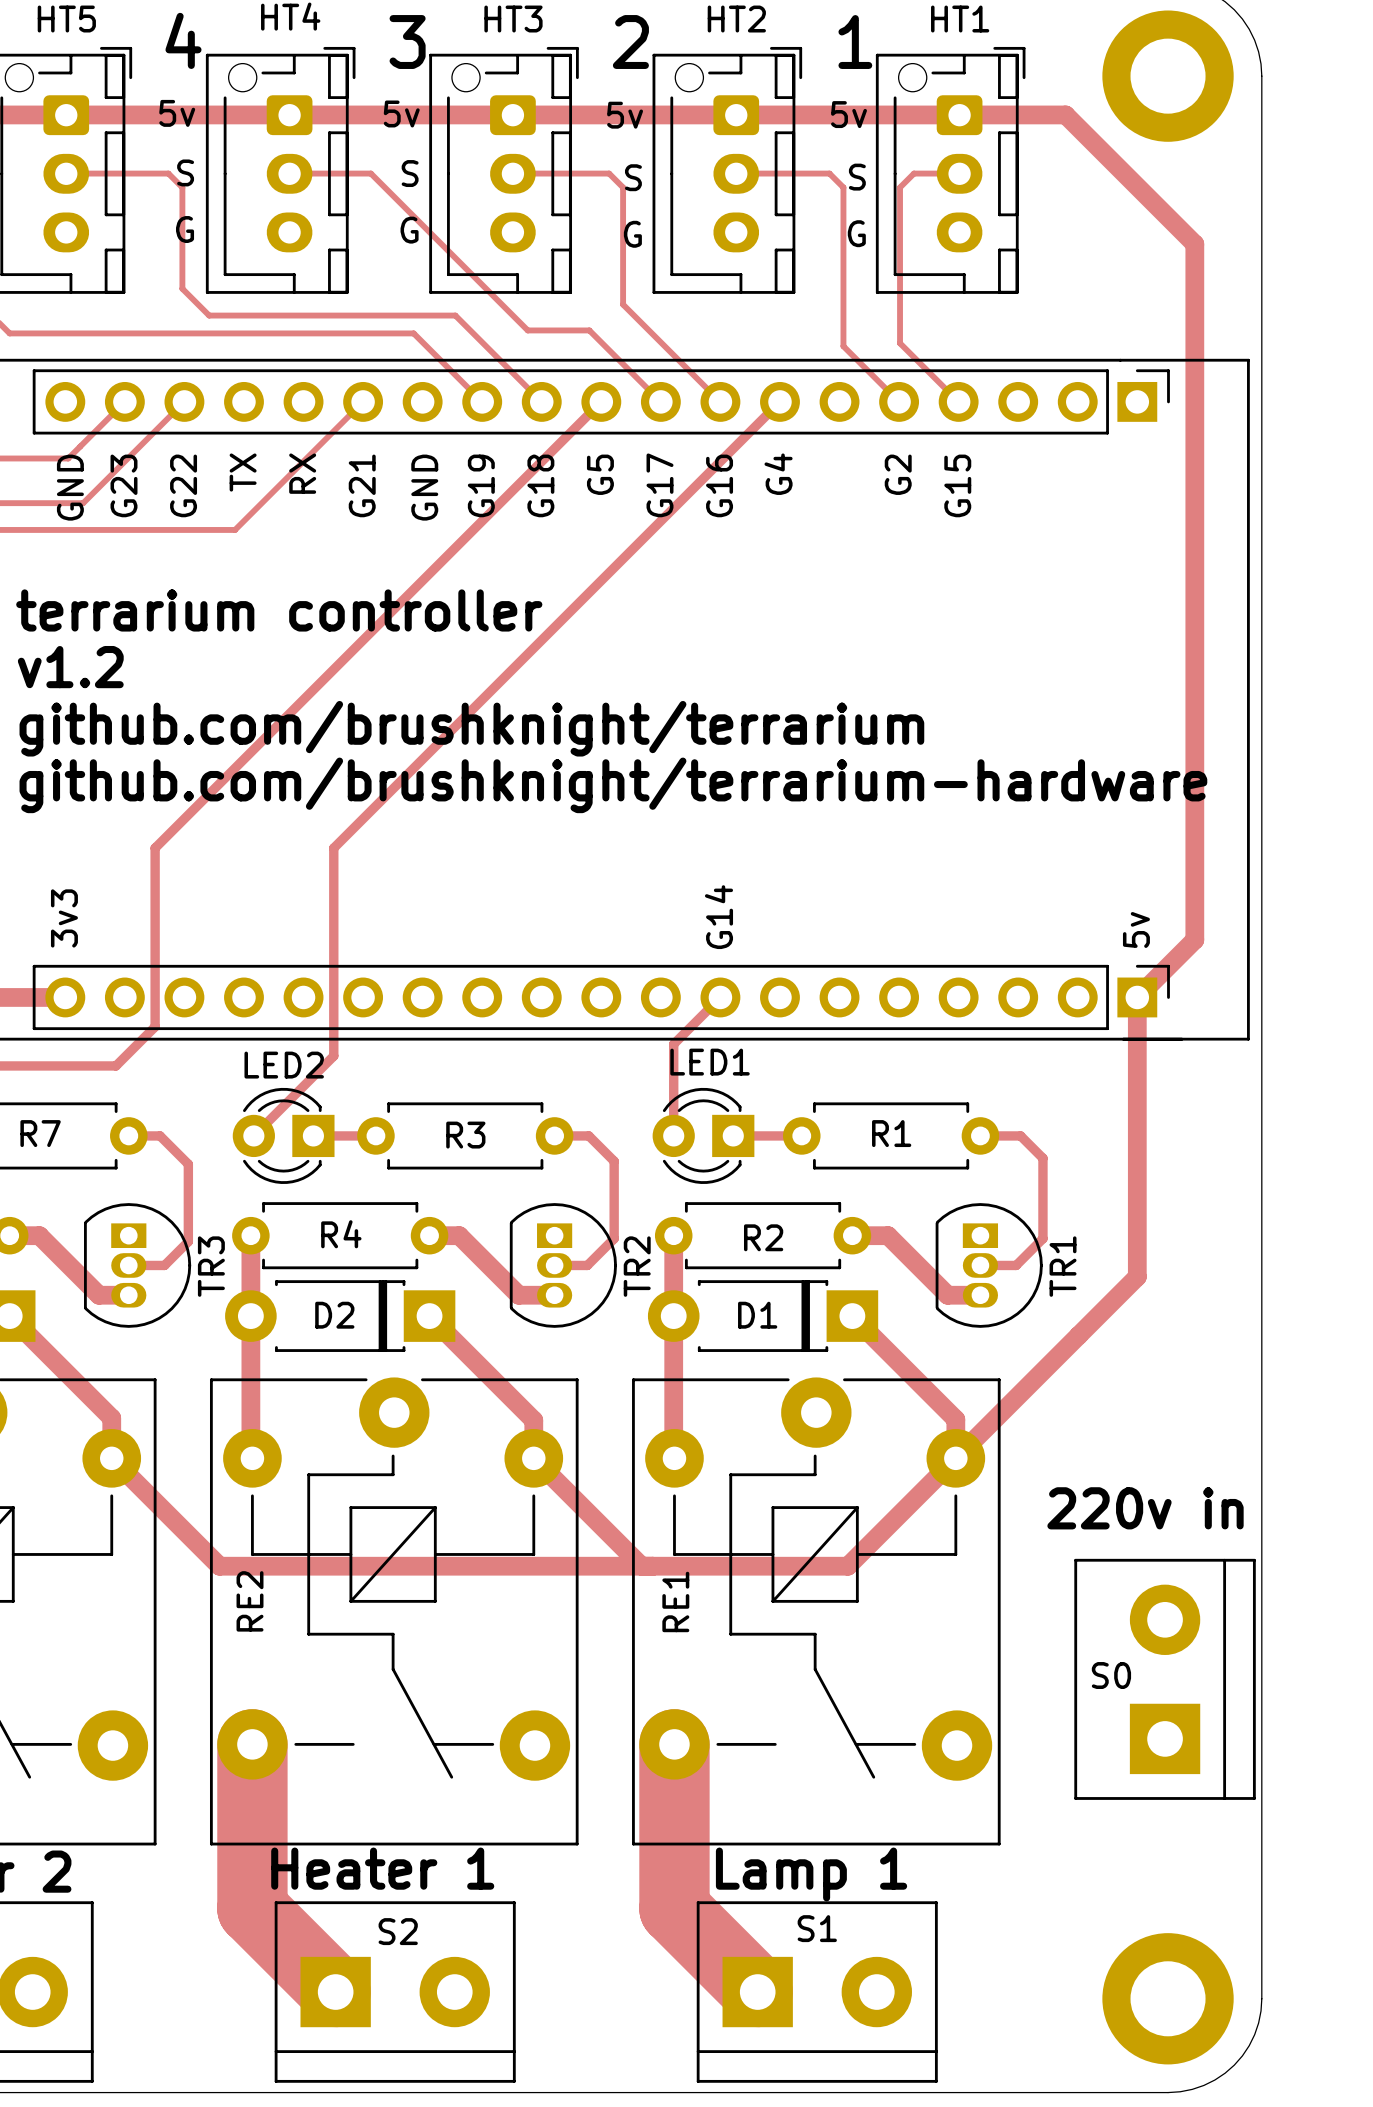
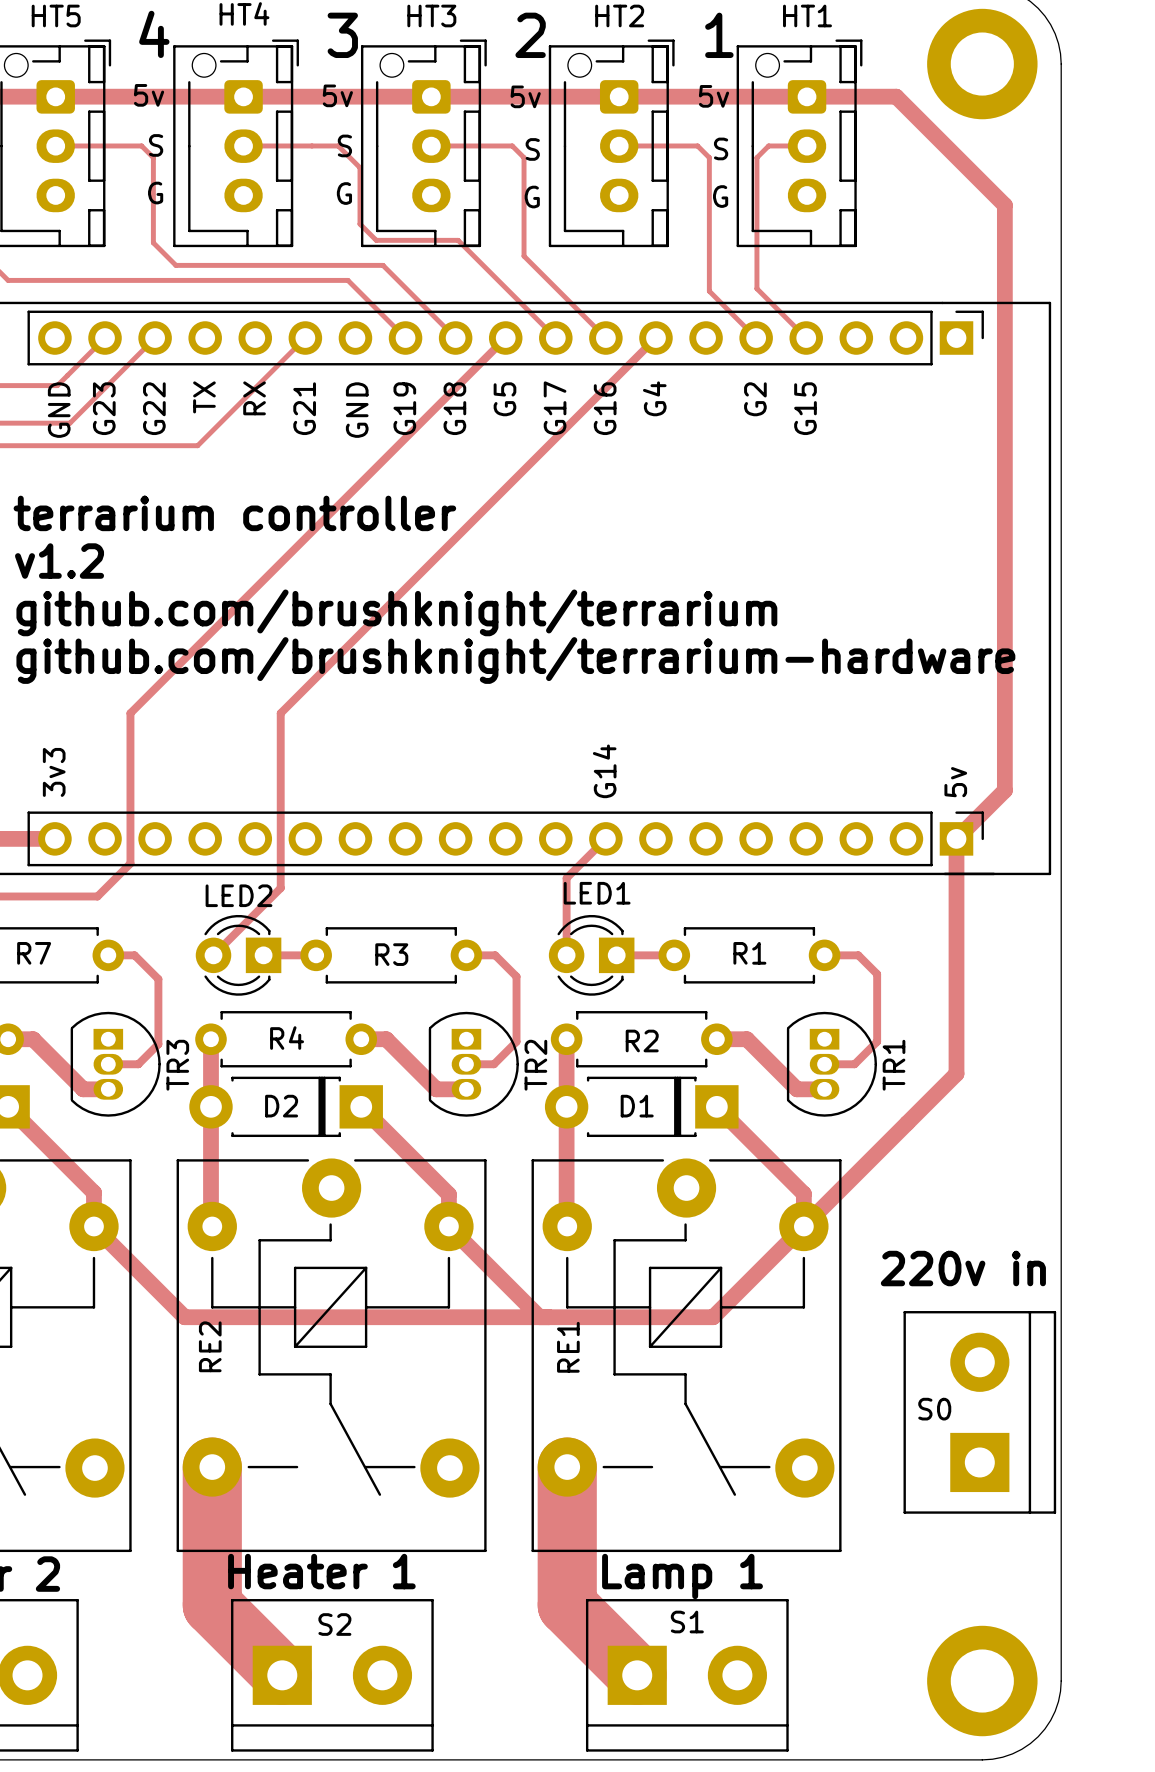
track: (370, 173) (527, 330) (589, 330) -> (311, 145) (338, 145) (360, 167) (360, 224) (376, 240) (458, 240) (495, 277)

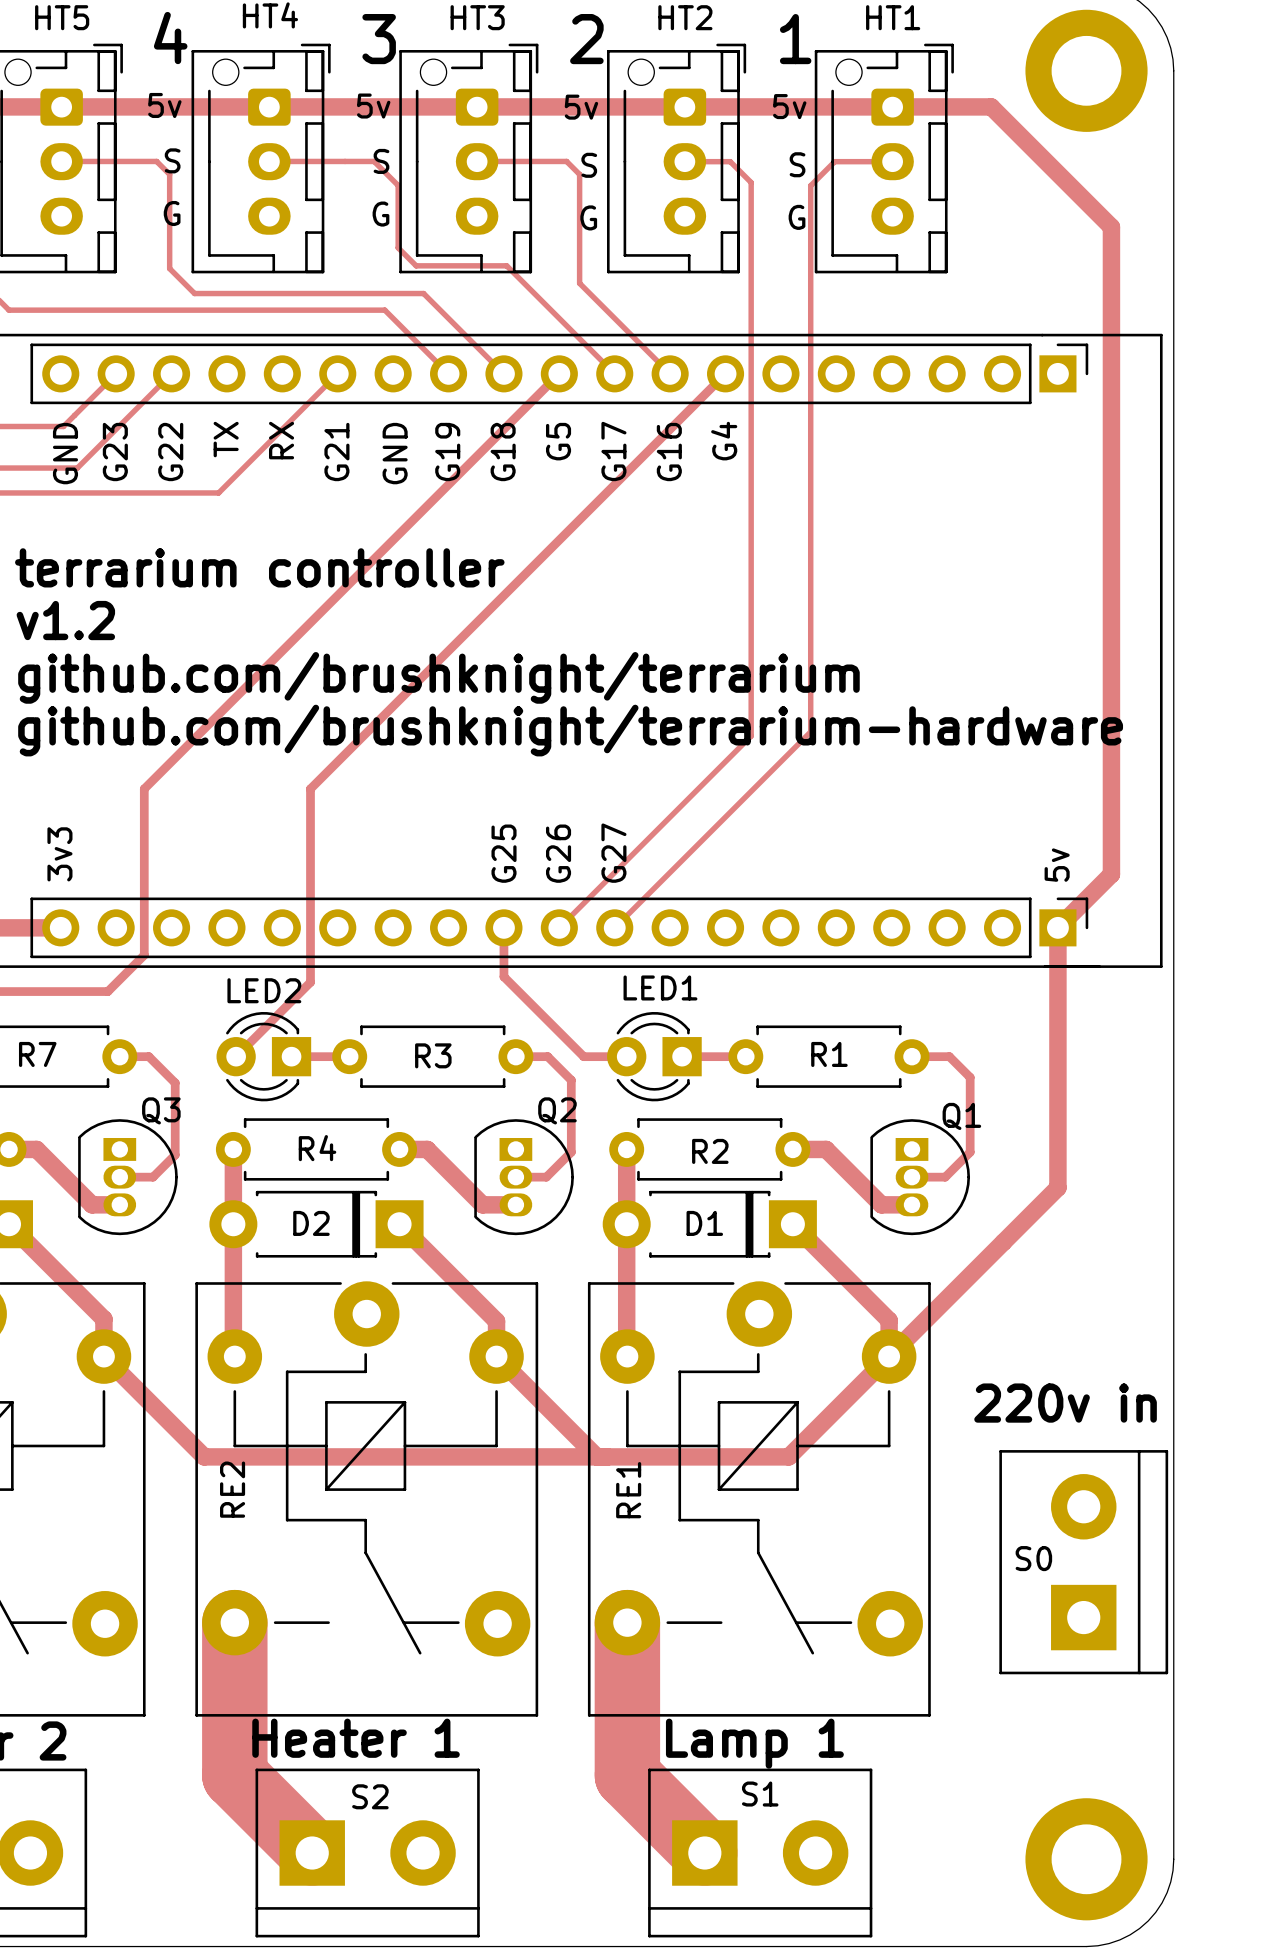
track: (768, 145) (756, 157) (756, 288) (806, 338) -> (850, 161) (834, 161) (810, 185) (810, 731) (614, 927)
track: (660, 146) (697, 145) (709, 157) (709, 291) (756, 338) -> (730, 161) (751, 182) (751, 736) (559, 927)
text: G2 (755, 399) -> none
text: G15 (805, 408) -> none
text: none -> G25 (504, 853)
text: none -> G26 (558, 853)
text: none -> G27 (613, 853)
text: G14 (604, 771) -> none
track: (605, 838) (566, 878) (566, 955) -> (503, 927) (503, 976) (583, 1056) (626, 1056)
TR3 name: TR3 (177, 1065) -> Q3 (161, 1110)
TR2 name: TR2 (535, 1065) -> Q2 (557, 1110)
TR1 name: TR1 (894, 1065) -> Q1 (961, 1116)

